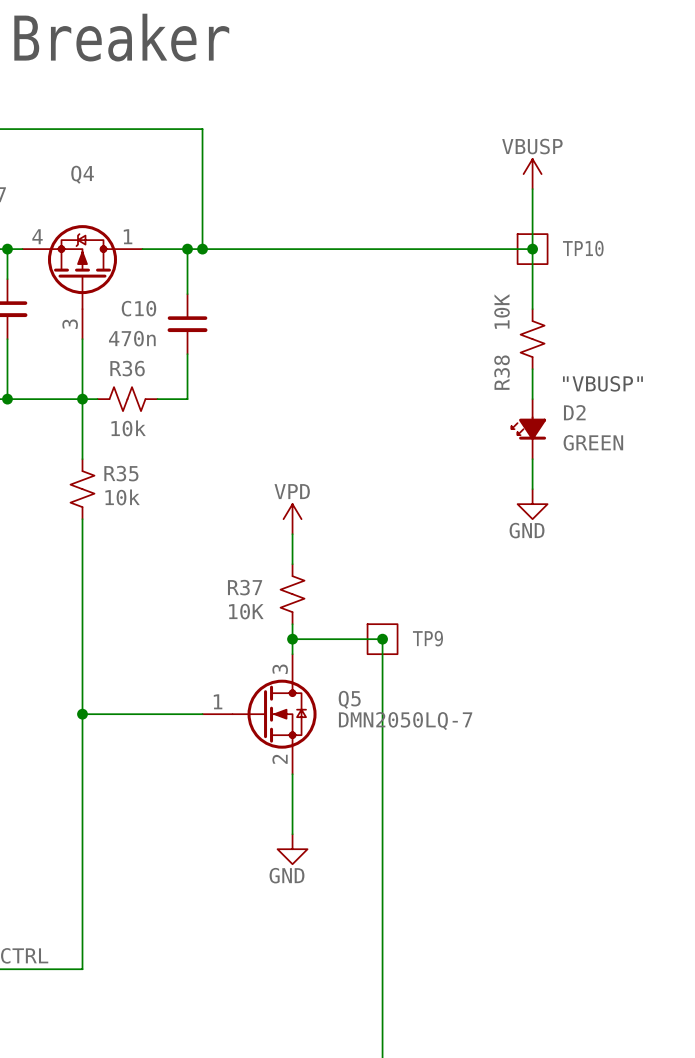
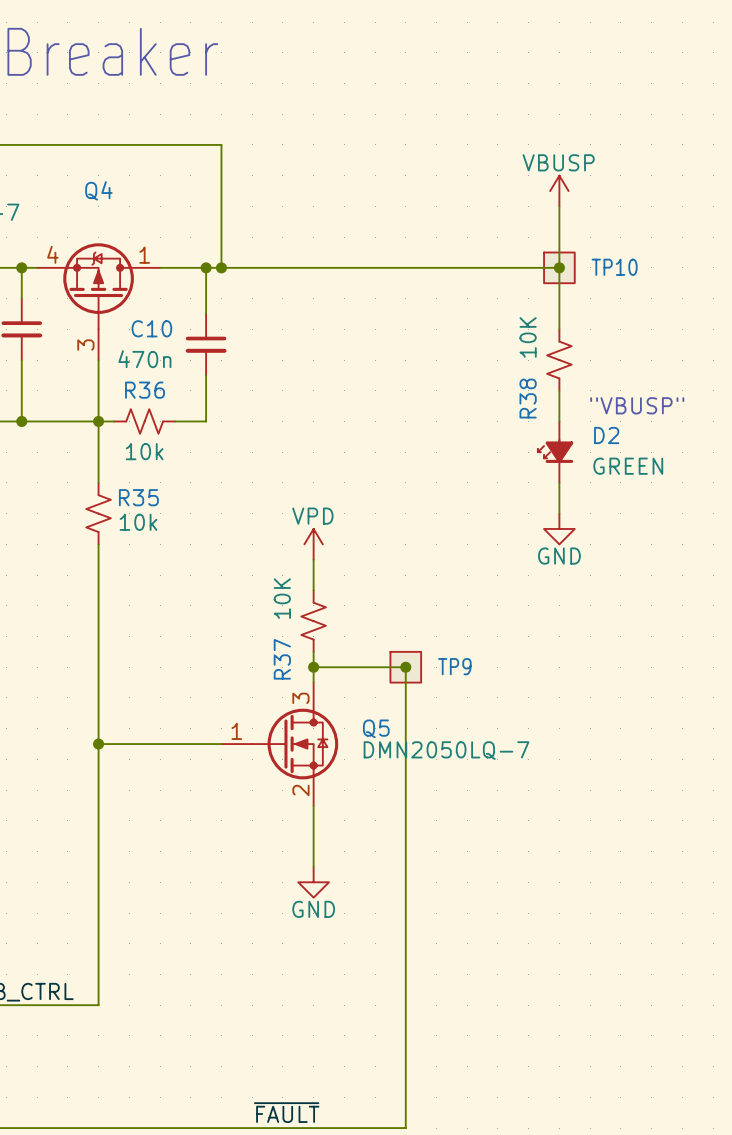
R37 name rotation: 0° (245, 587) -> 90° counterclockwise (282, 659)
R37 value rotation: 0° (246, 611) -> 90° counterclockwise (282, 598)

